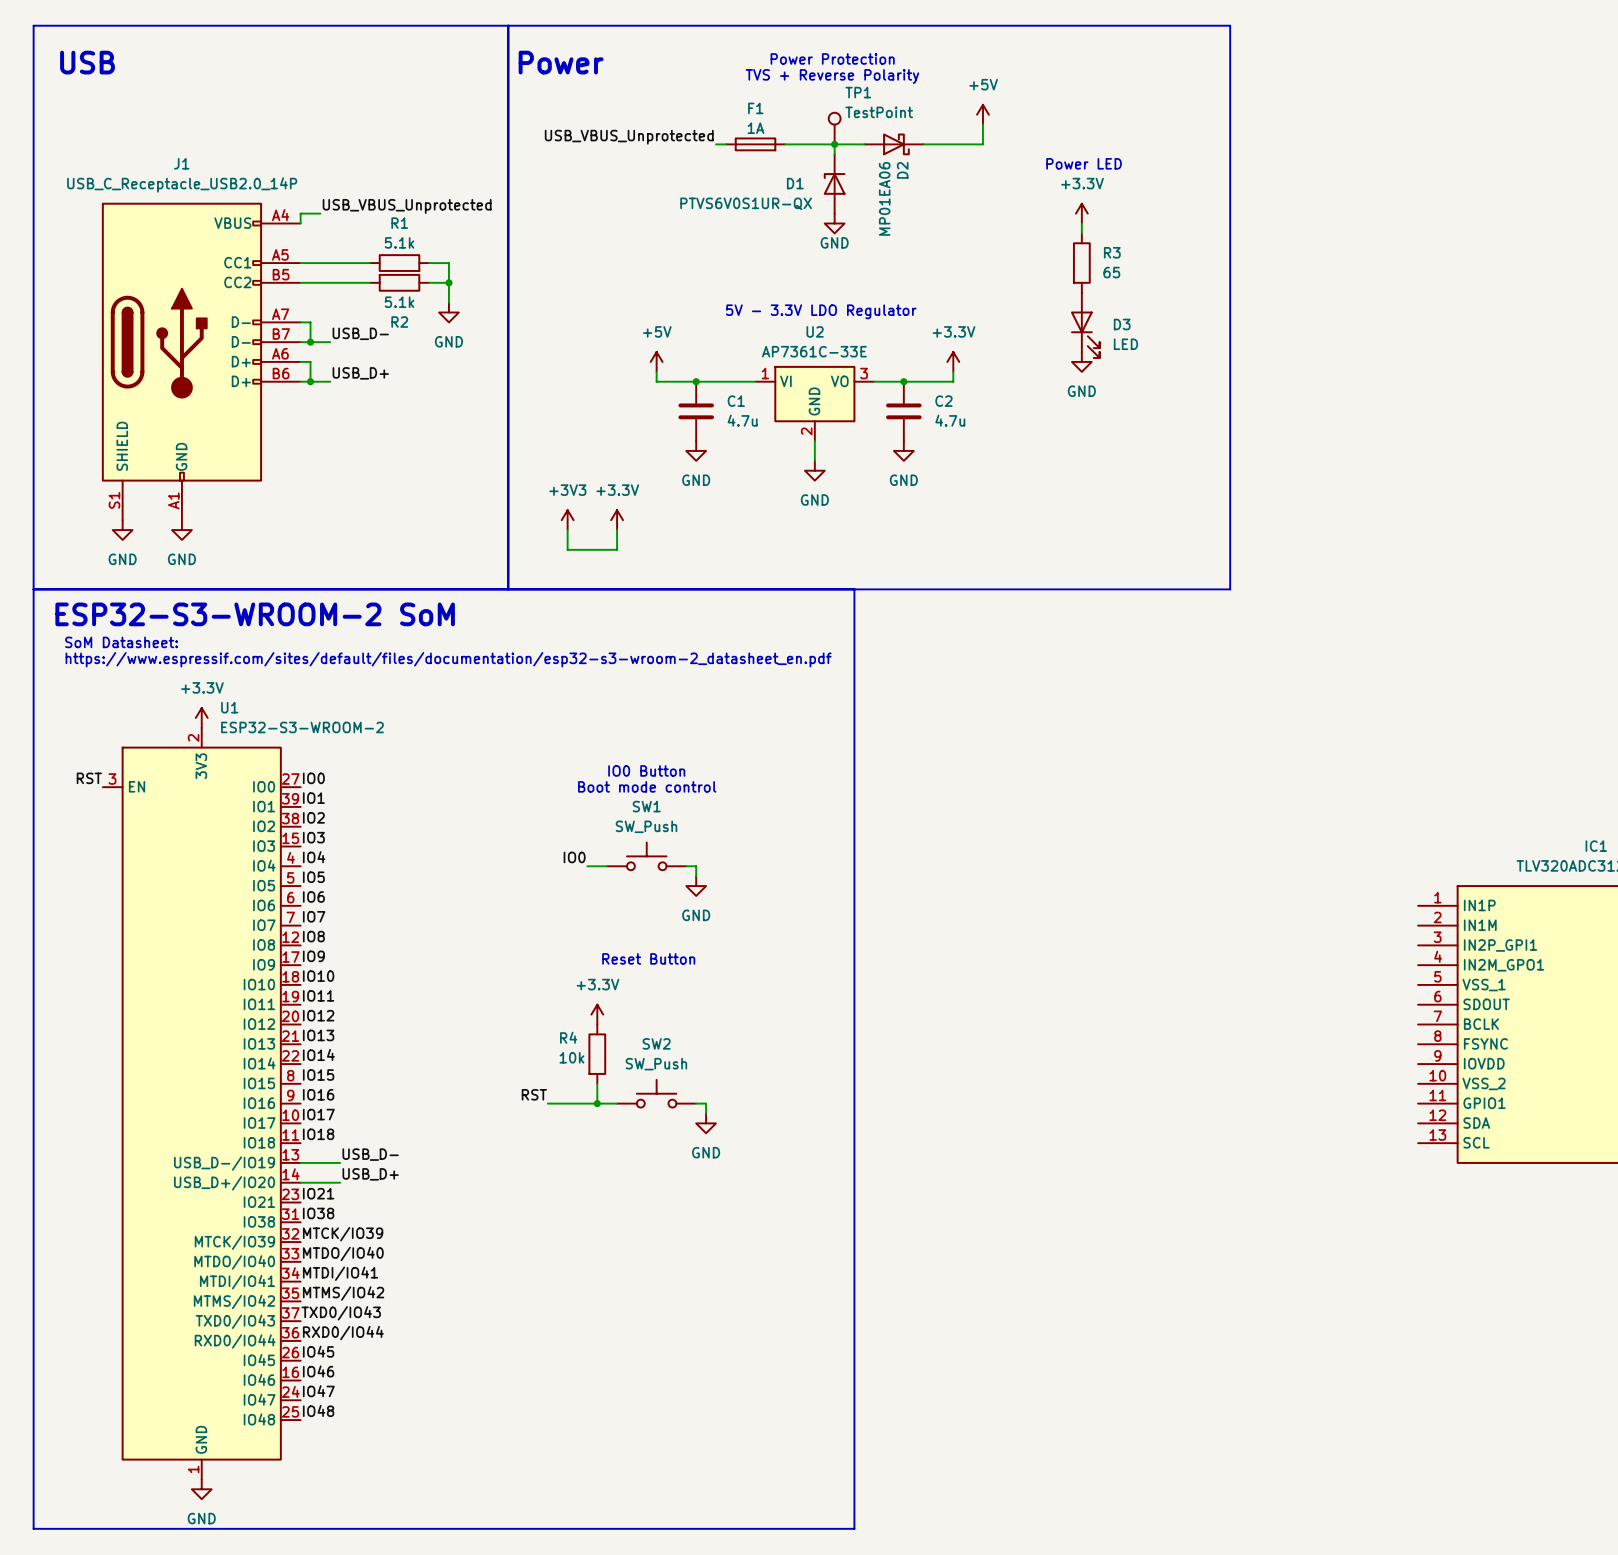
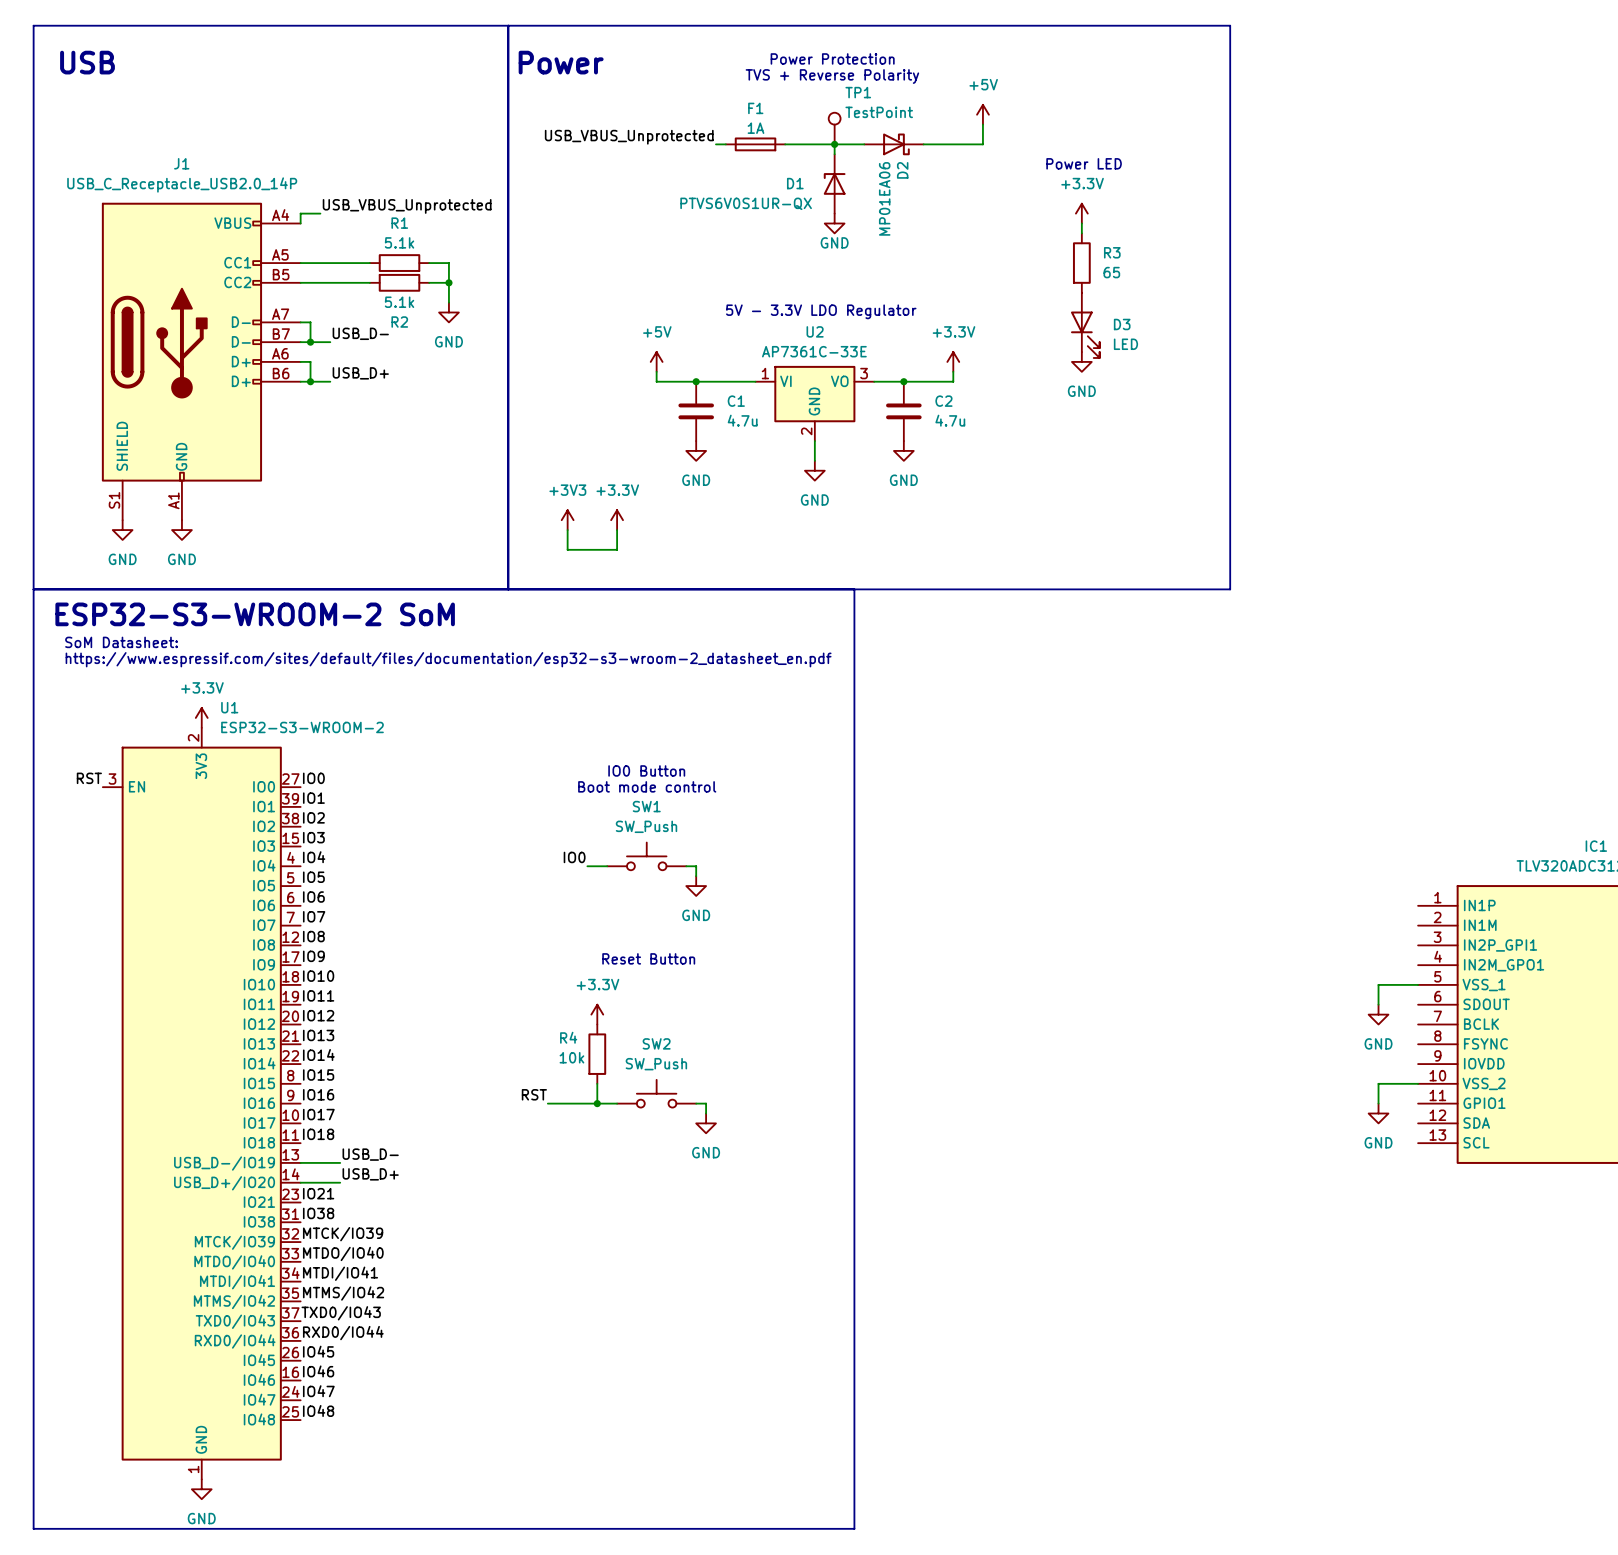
wire: none -> (1418, 984) (1378, 984) (1378, 1004)
power symbol: none -> GND (1378, 1014)
wire: none -> (1418, 1083) (1378, 1083) (1378, 1103)
power symbol: none -> GND (1378, 1113)

